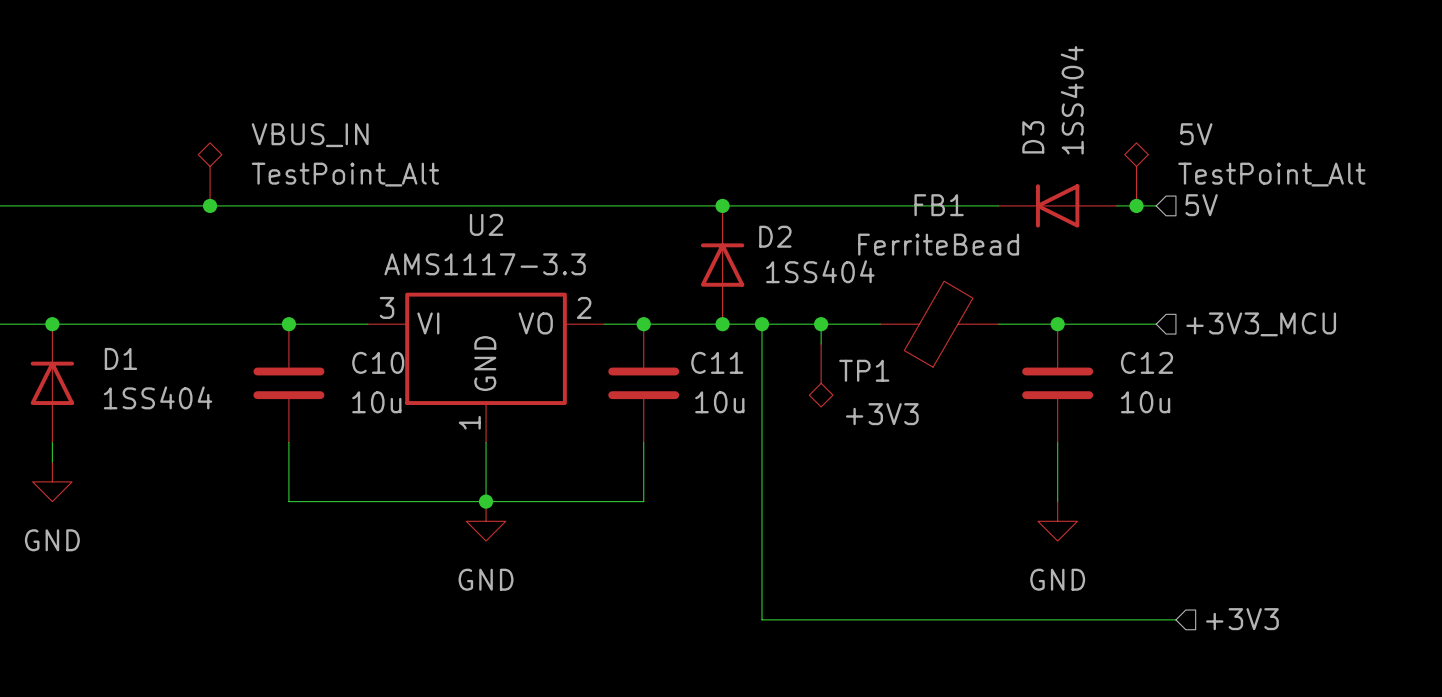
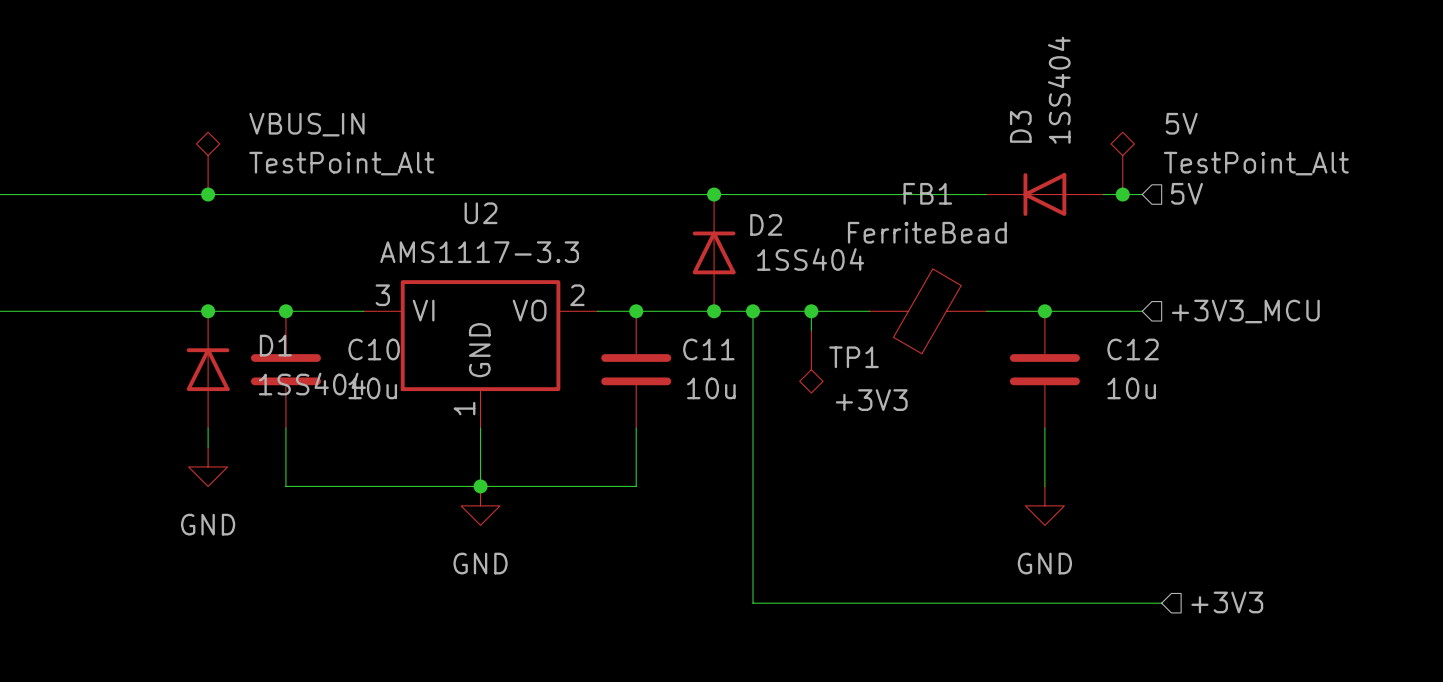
junction: (52, 324) -> none
junction: none -> (208, 311)
D1 position: (52, 383) -> (208, 369)
wire: (52, 442) (52, 462) -> (208, 428) (208, 447)
power symbol position: GND (52, 481) -> GND (208, 466)

